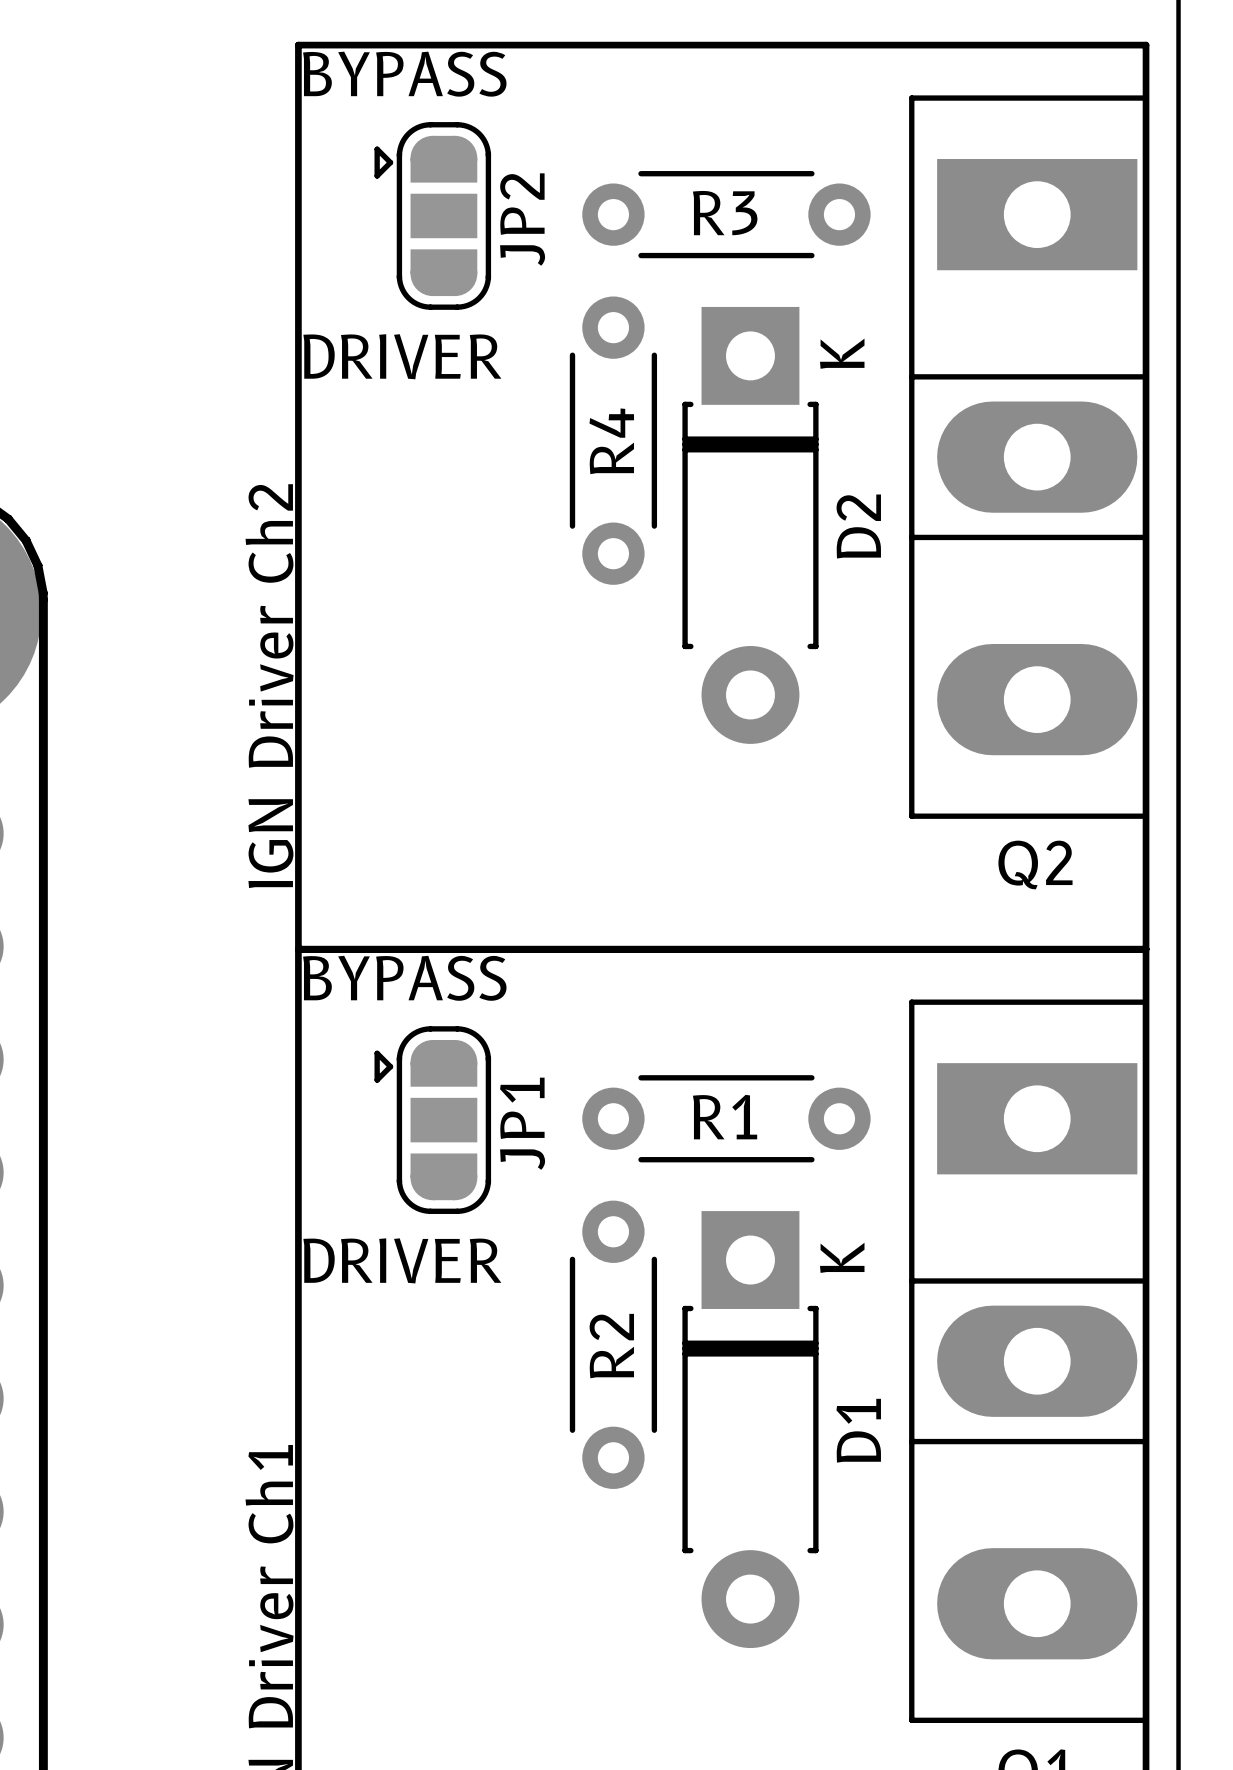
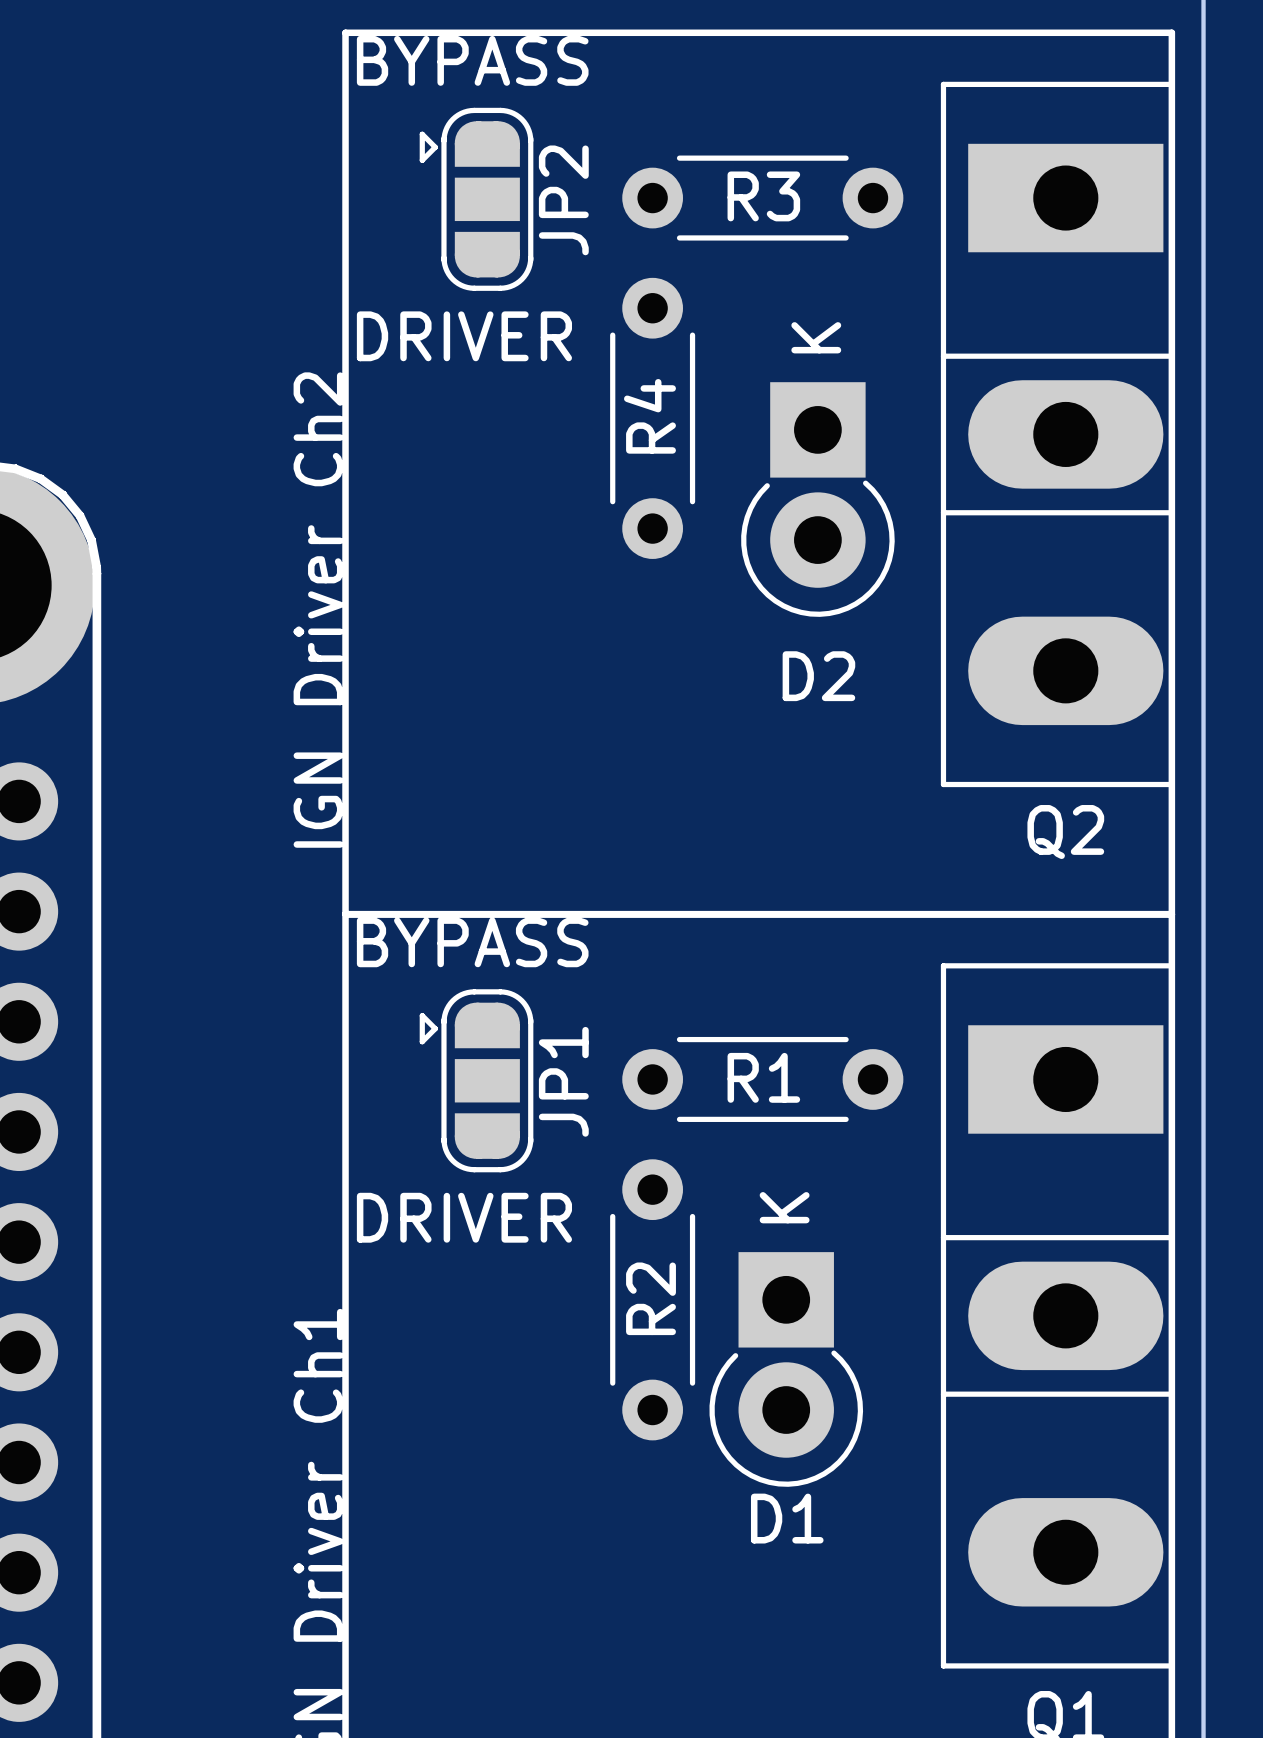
D2 footprint: [682, 306, 819, 744] -> [741, 382, 895, 617]
D2 name position: D2 (858, 526) -> D2 (818, 676)
D1 footprint: [682, 1211, 819, 1649] -> [709, 1252, 864, 1487]
D1 name position: D1 (858, 1430) -> D1 (787, 1518)

